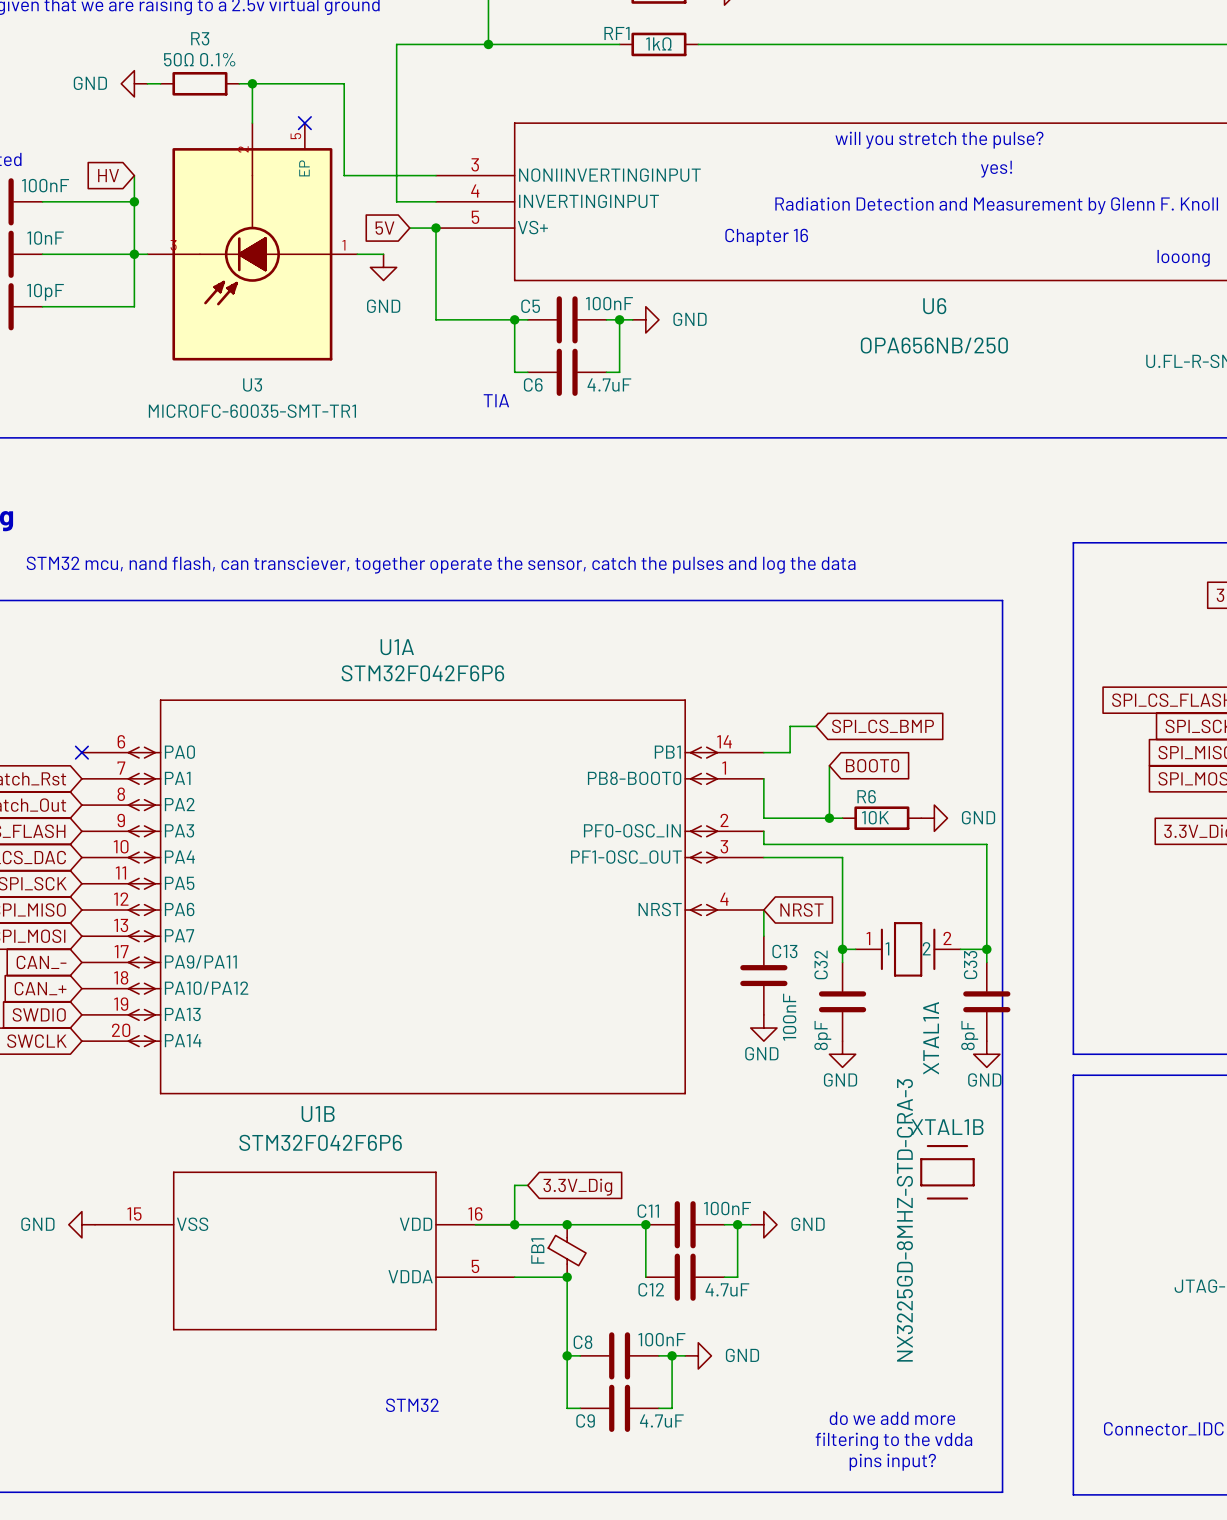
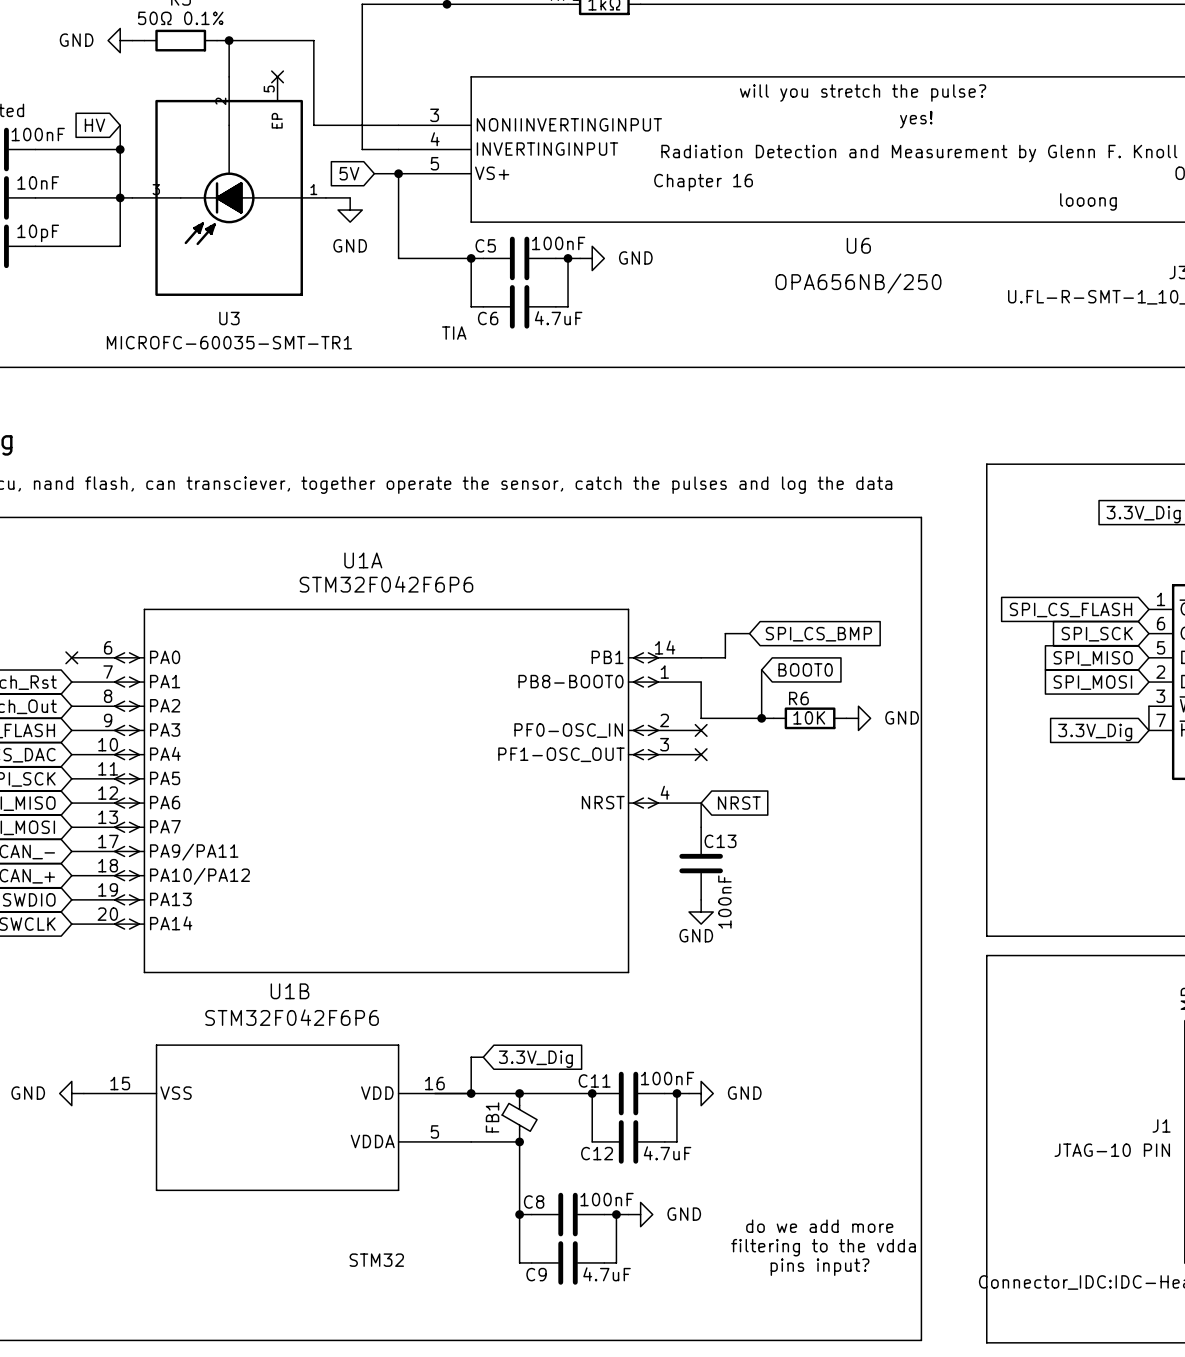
wire: (763, 831) (763, 844) (986, 844) (986, 962) -> none
no-connect mark: none -> (701, 730)
wire: (763, 857) (842, 857) (842, 962) -> none
no-connect mark: none -> (701, 754)
wire: (842, 949) (855, 949) -> none
junction: (842, 949) -> none
XTAL1A: NX3225GD-8MHZ-STD-CRA-3 (908, 949) -> none
wire: (960, 949) (986, 949) -> none
junction: (986, 949) -> none
C32: 8pF (842, 1001) -> none
C33: 8pF (986, 1001) -> none
power symbol: GND (842, 1054) -> none
power symbol: GND (986, 1054) -> none
XTAL1B: (947, 1172) -> none
text position: do we add more (892, 1418) -> do we add more (819, 1226)
text position: filtering to the vdda (893, 1441) -> filtering to the vdda (823, 1247)
text position: pins input? (892, 1462) -> pins input? (820, 1267)

